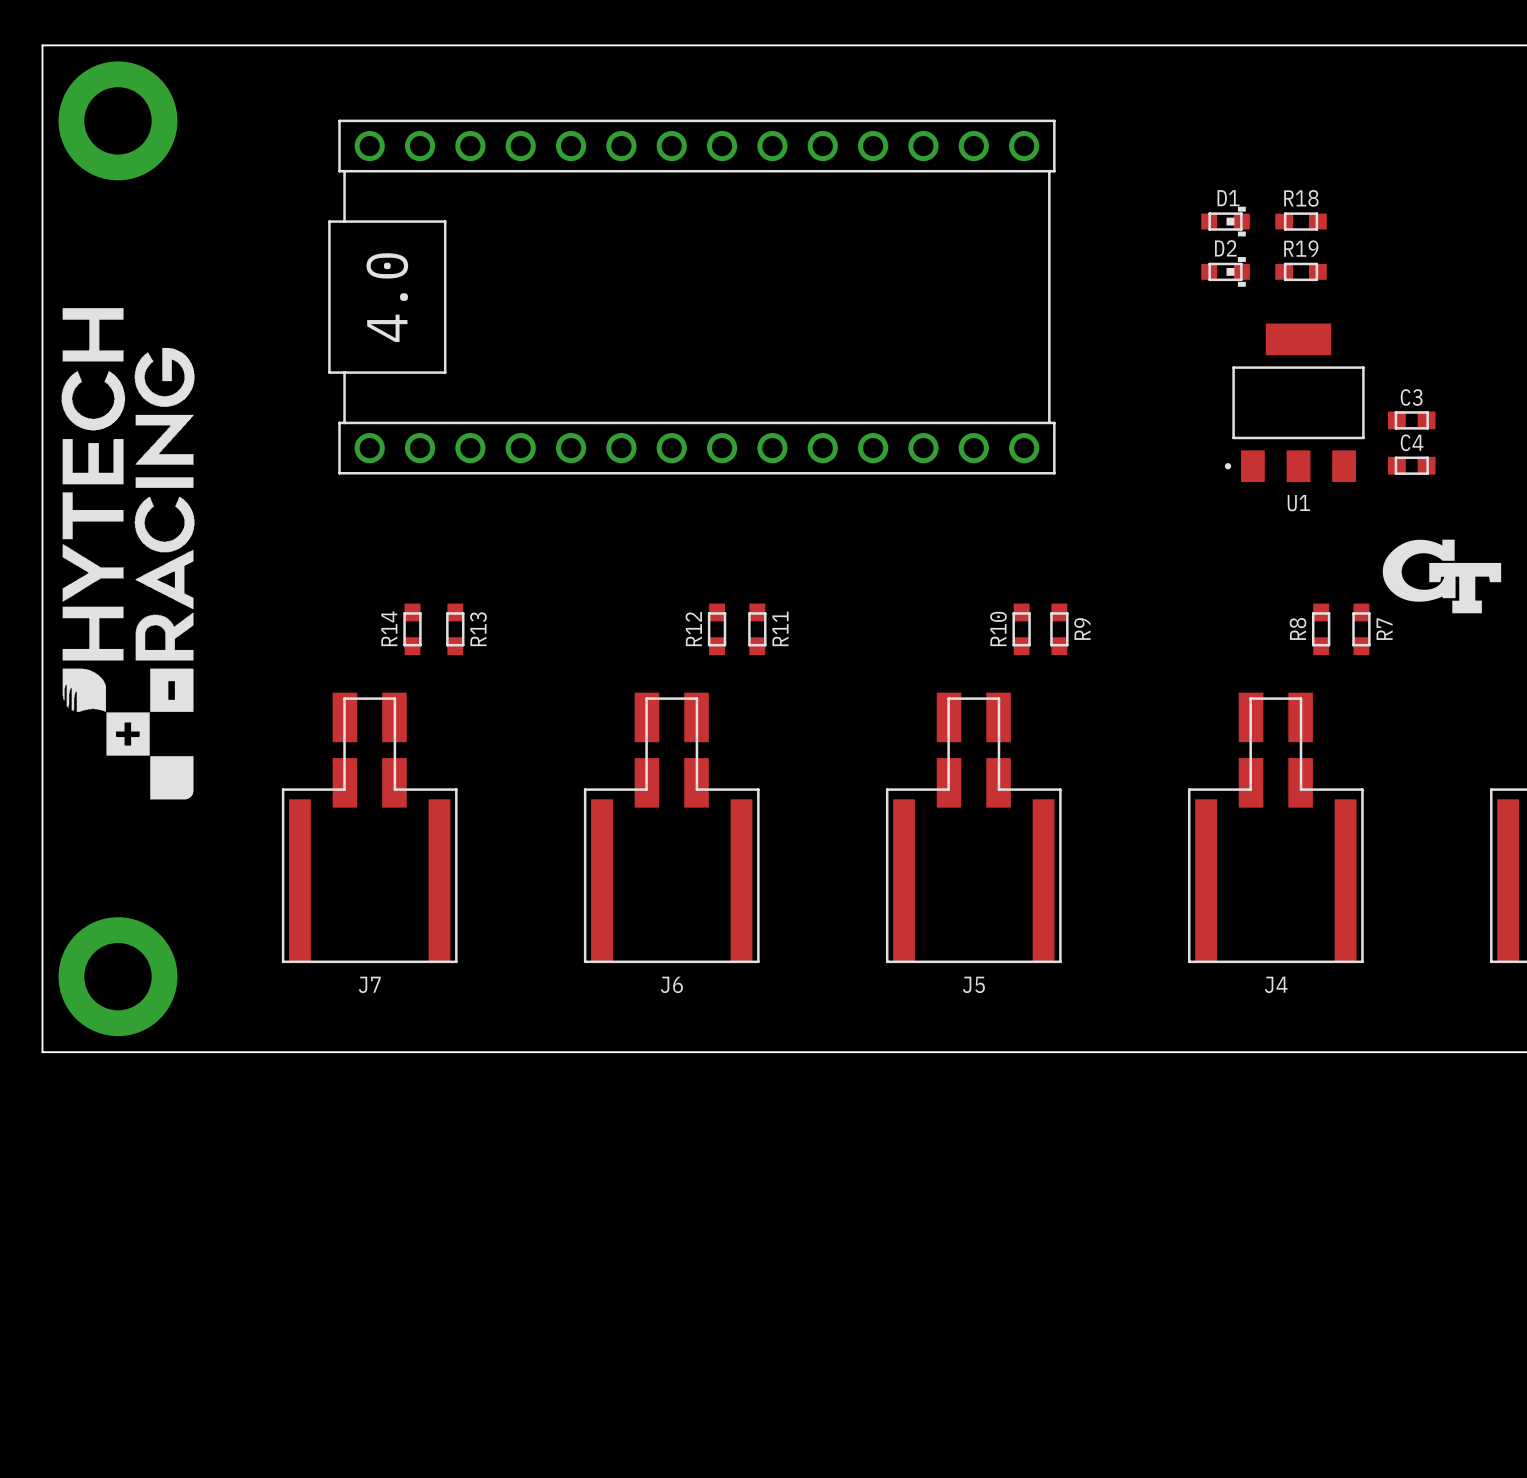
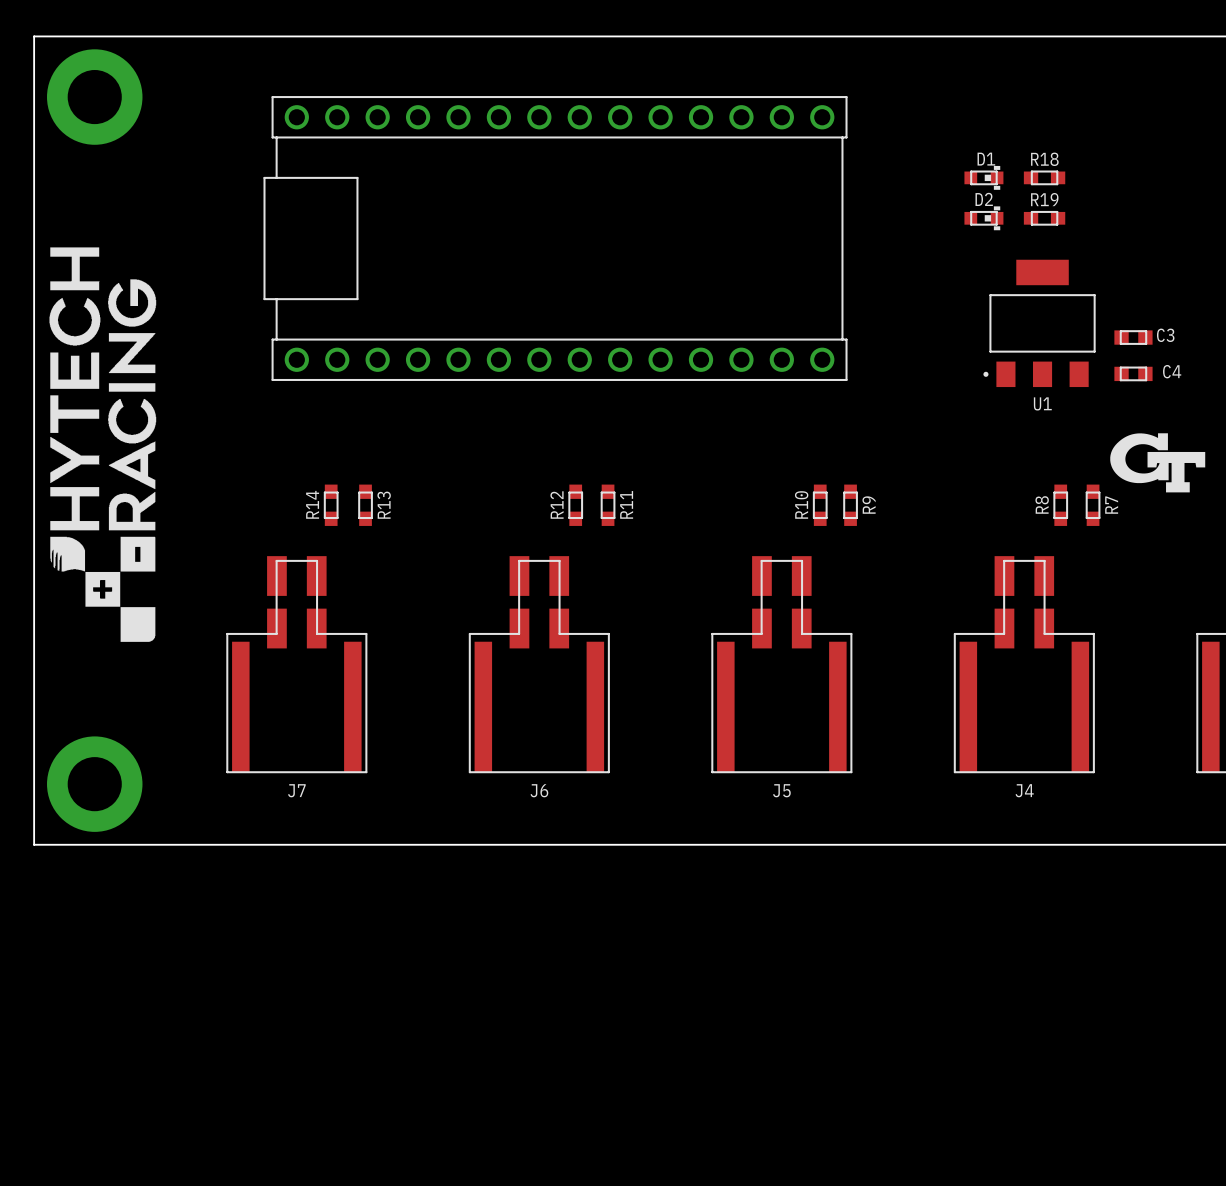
text: 4.0 (387, 297) -> none
C3 name position: C3 (1411, 397) -> C3 (1165, 335)
C4 name position: C4 (1412, 442) -> C4 (1172, 371)

